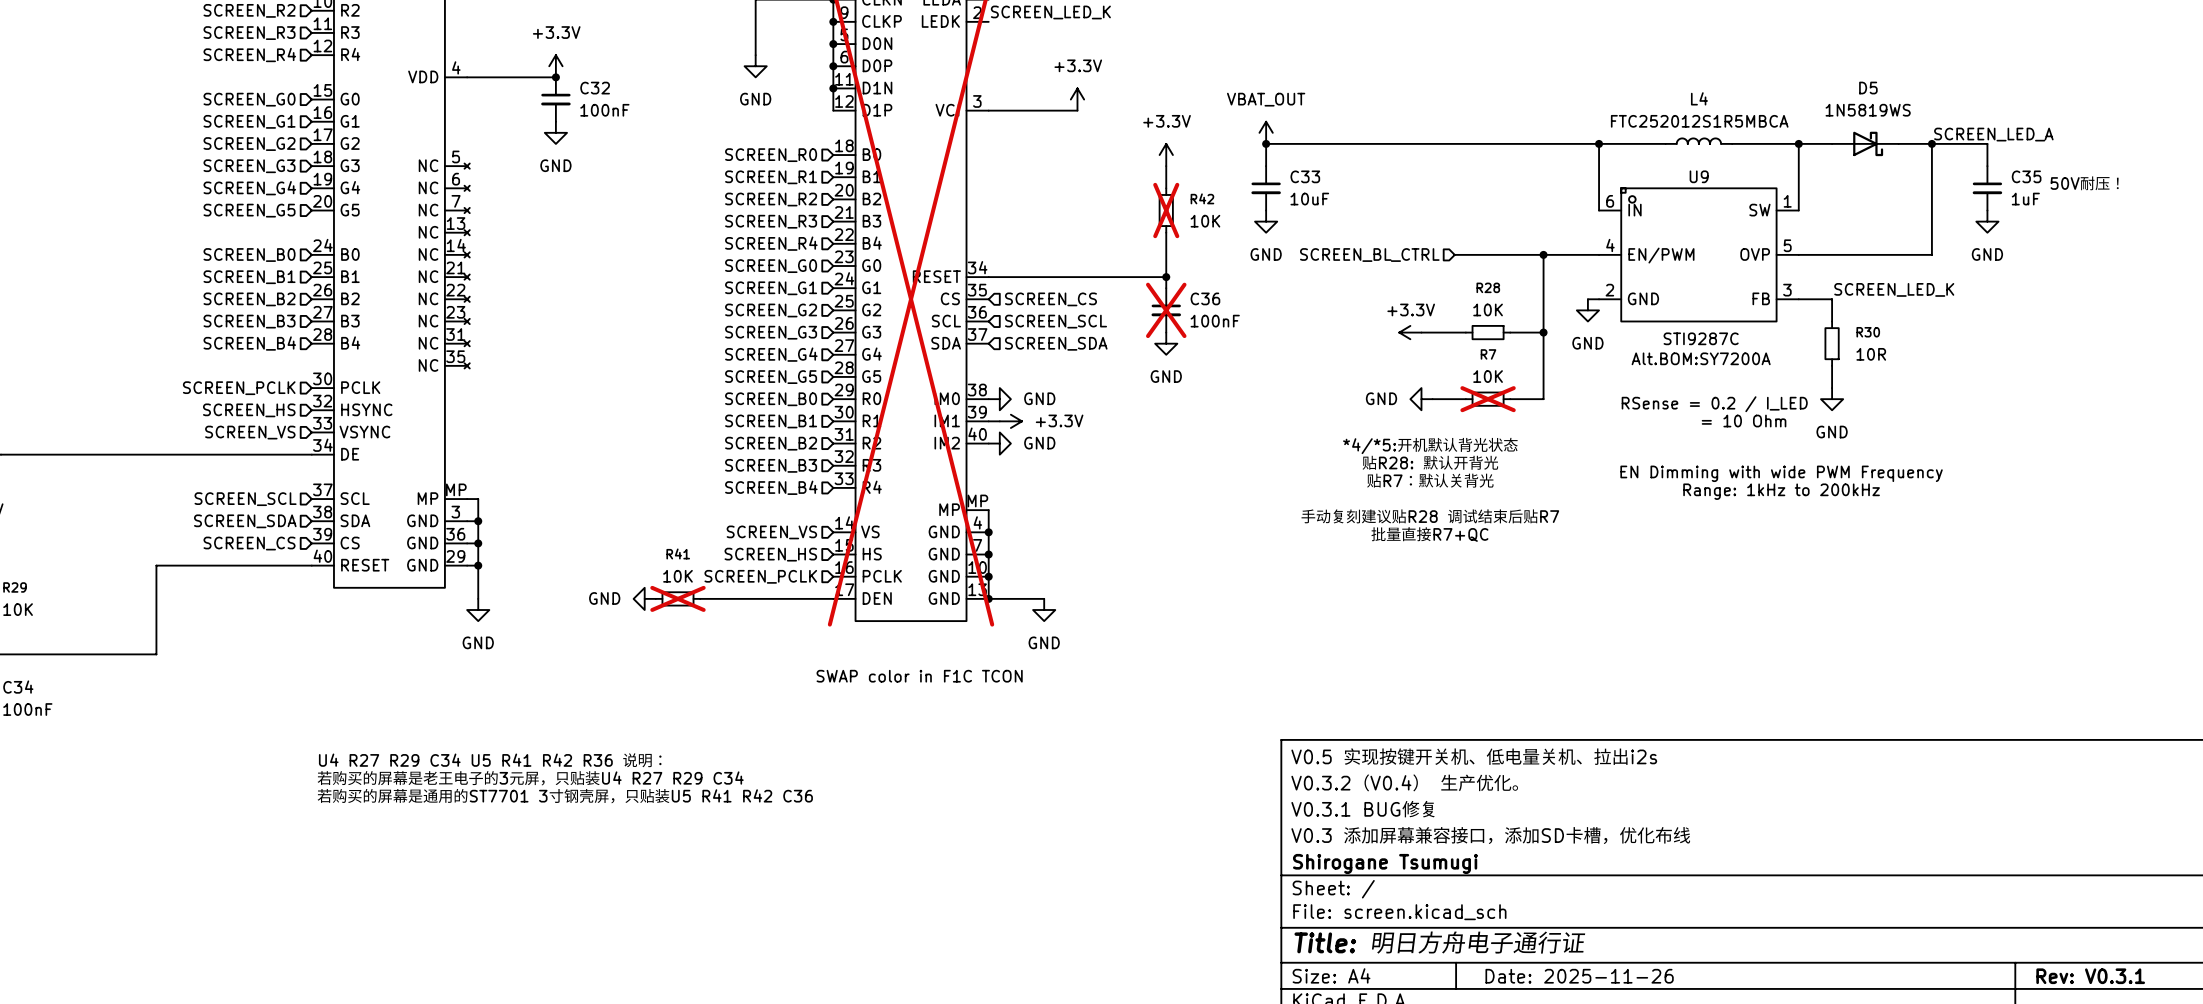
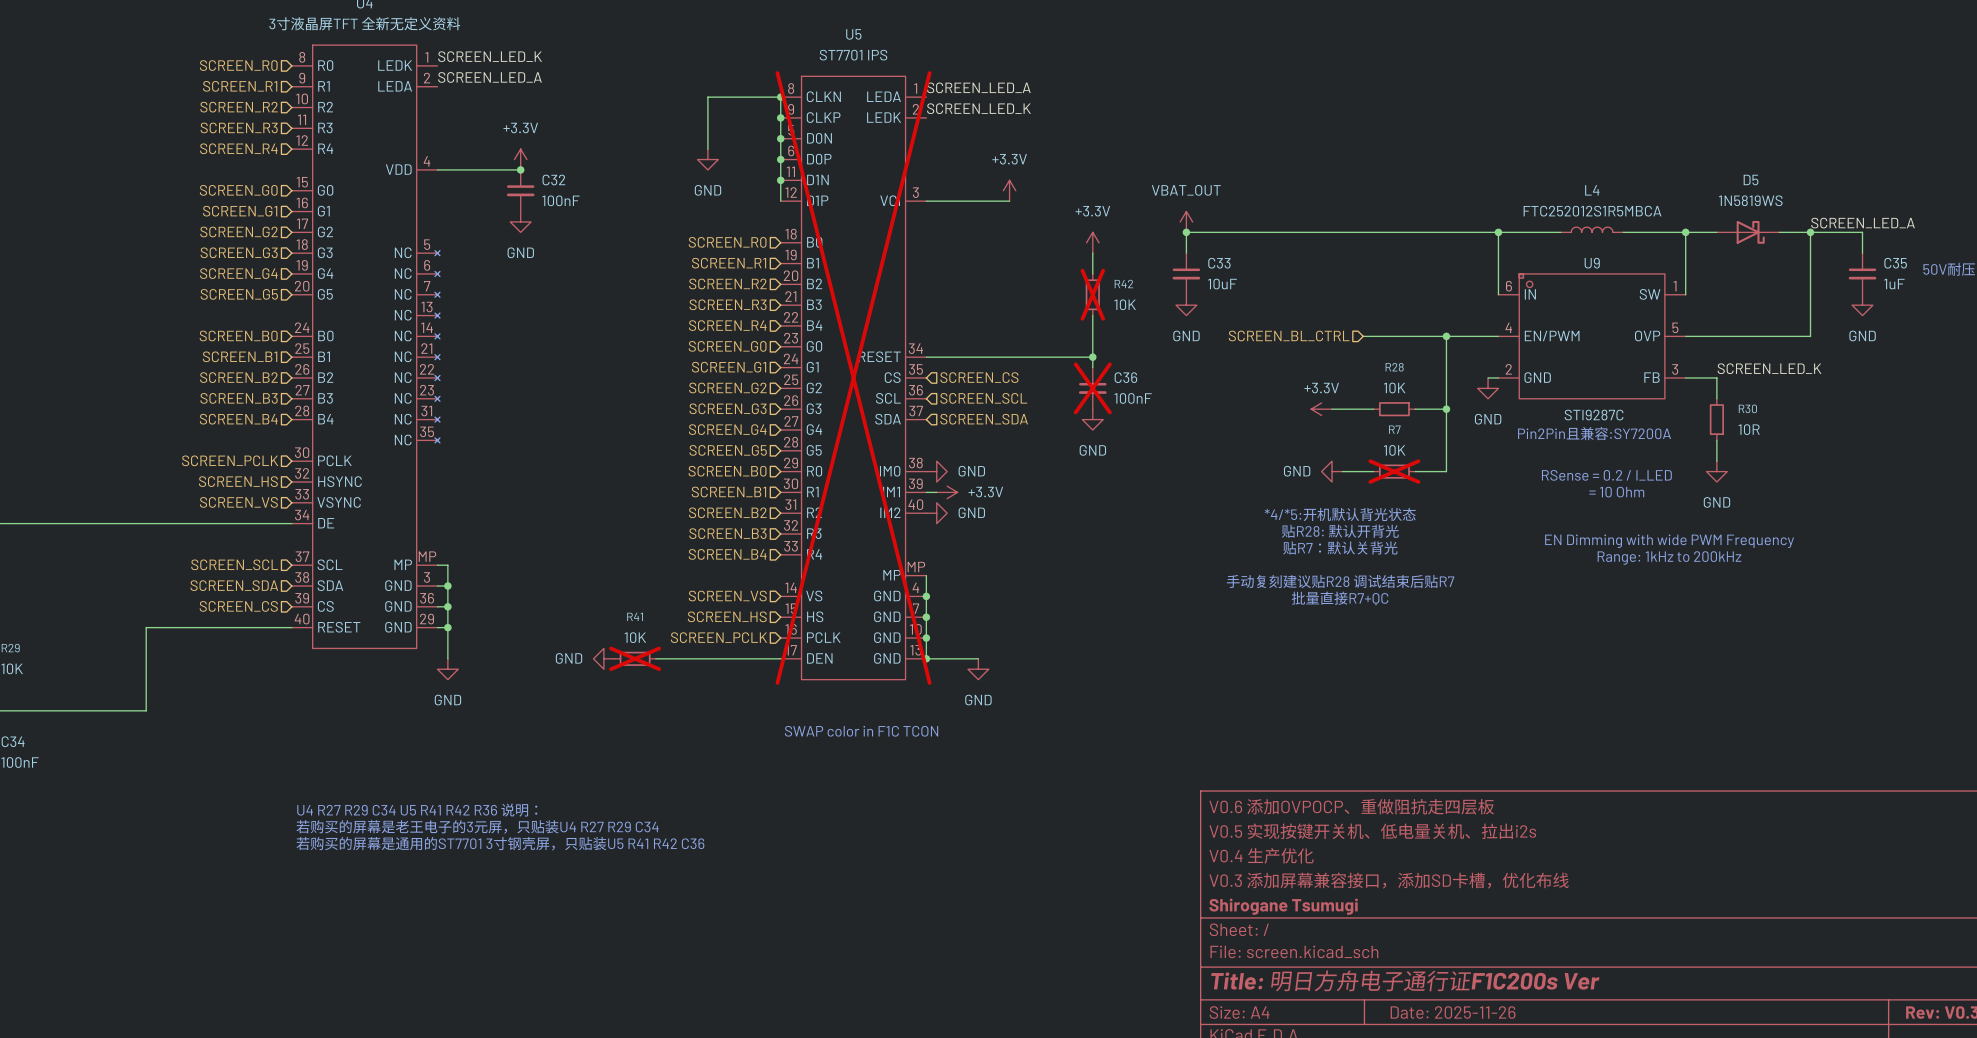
text: Alt.BOM:SY7200A (1701, 358) -> Pin2Pin且兼容:SY7200A (1594, 433)
title block: V0.5 实现按键开关机、低电量关机、拉出i2s (1474, 756) -> V0.6 添加OVPOCP、重做阻抗走四层板 (1351, 806)
title block: V0.3.2（V0.4） 生产优化。 (1405, 782) -> V0.5 实现按键开关机、低电量关机、拉出i2s (1372, 831)
title block: V0.3.1 BUG修复 (1363, 809) -> V0.4 生产优化 (1261, 855)
title block: Title: 明日方舟电子通行证 (1440, 942) -> Title: 明日方舟电子通行证F1C200s Ver (1405, 980)

